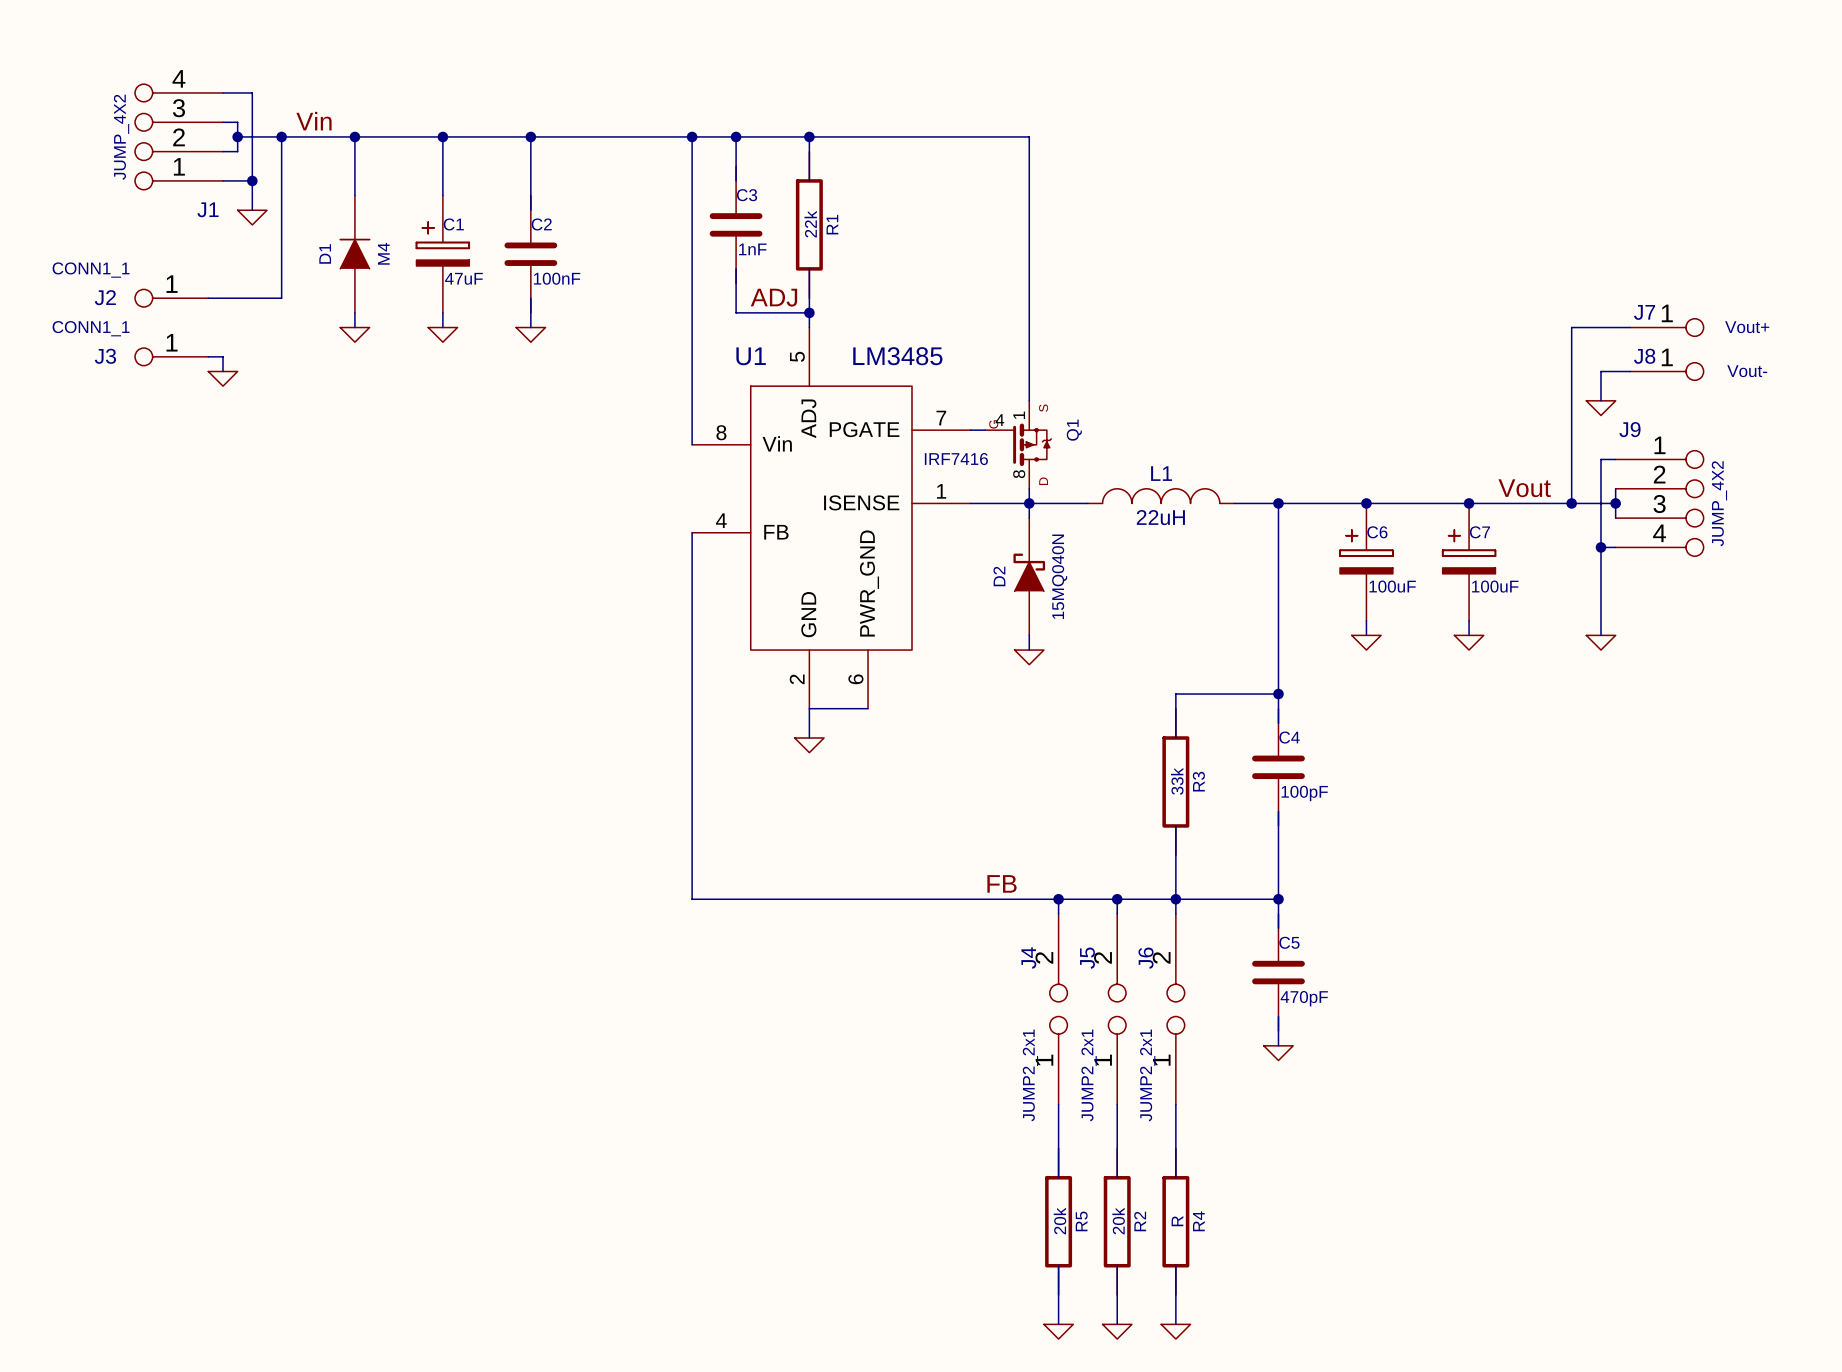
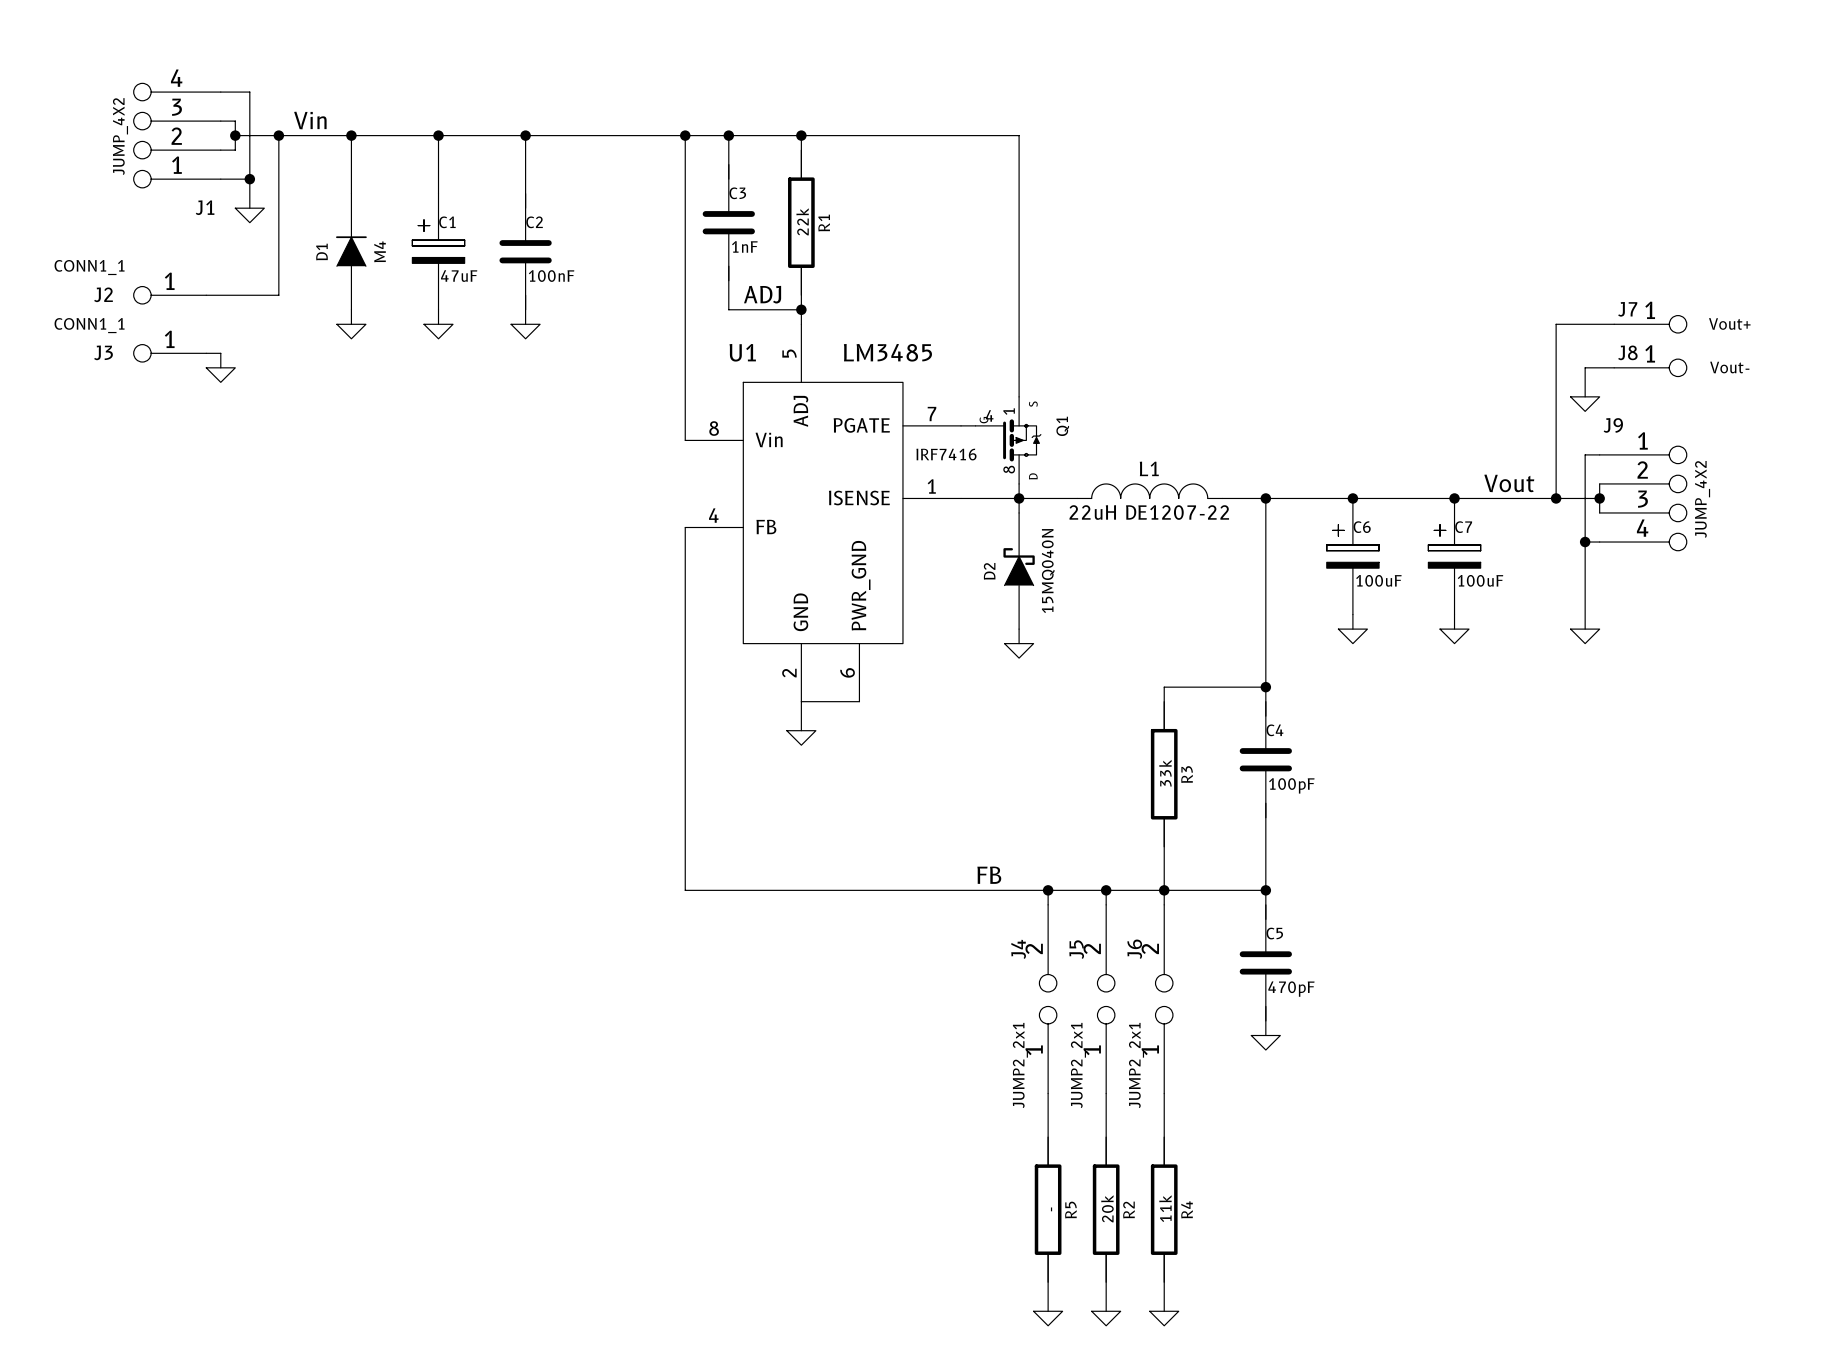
L1 value: 22uH (1160, 517) -> 22uH DE1207-22 (1149, 512)
R5 value: 20k (1059, 1221) -> - (1051, 1209)
R4 value: R (1177, 1221) -> 11k (1165, 1208)

